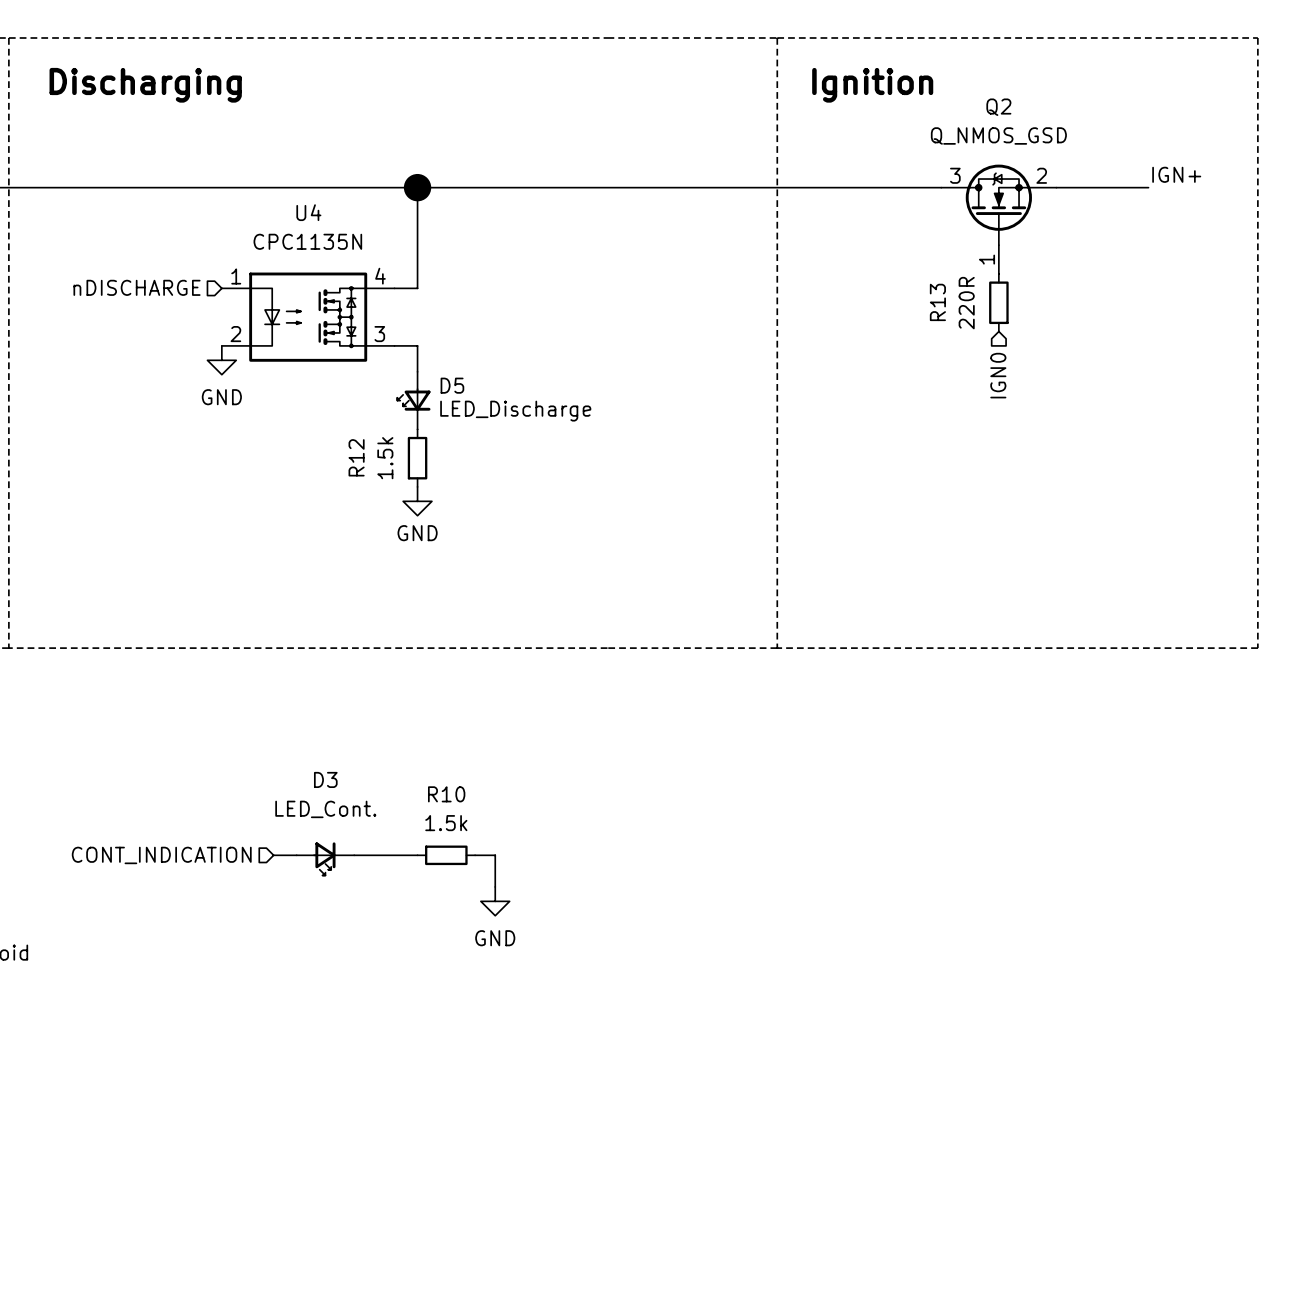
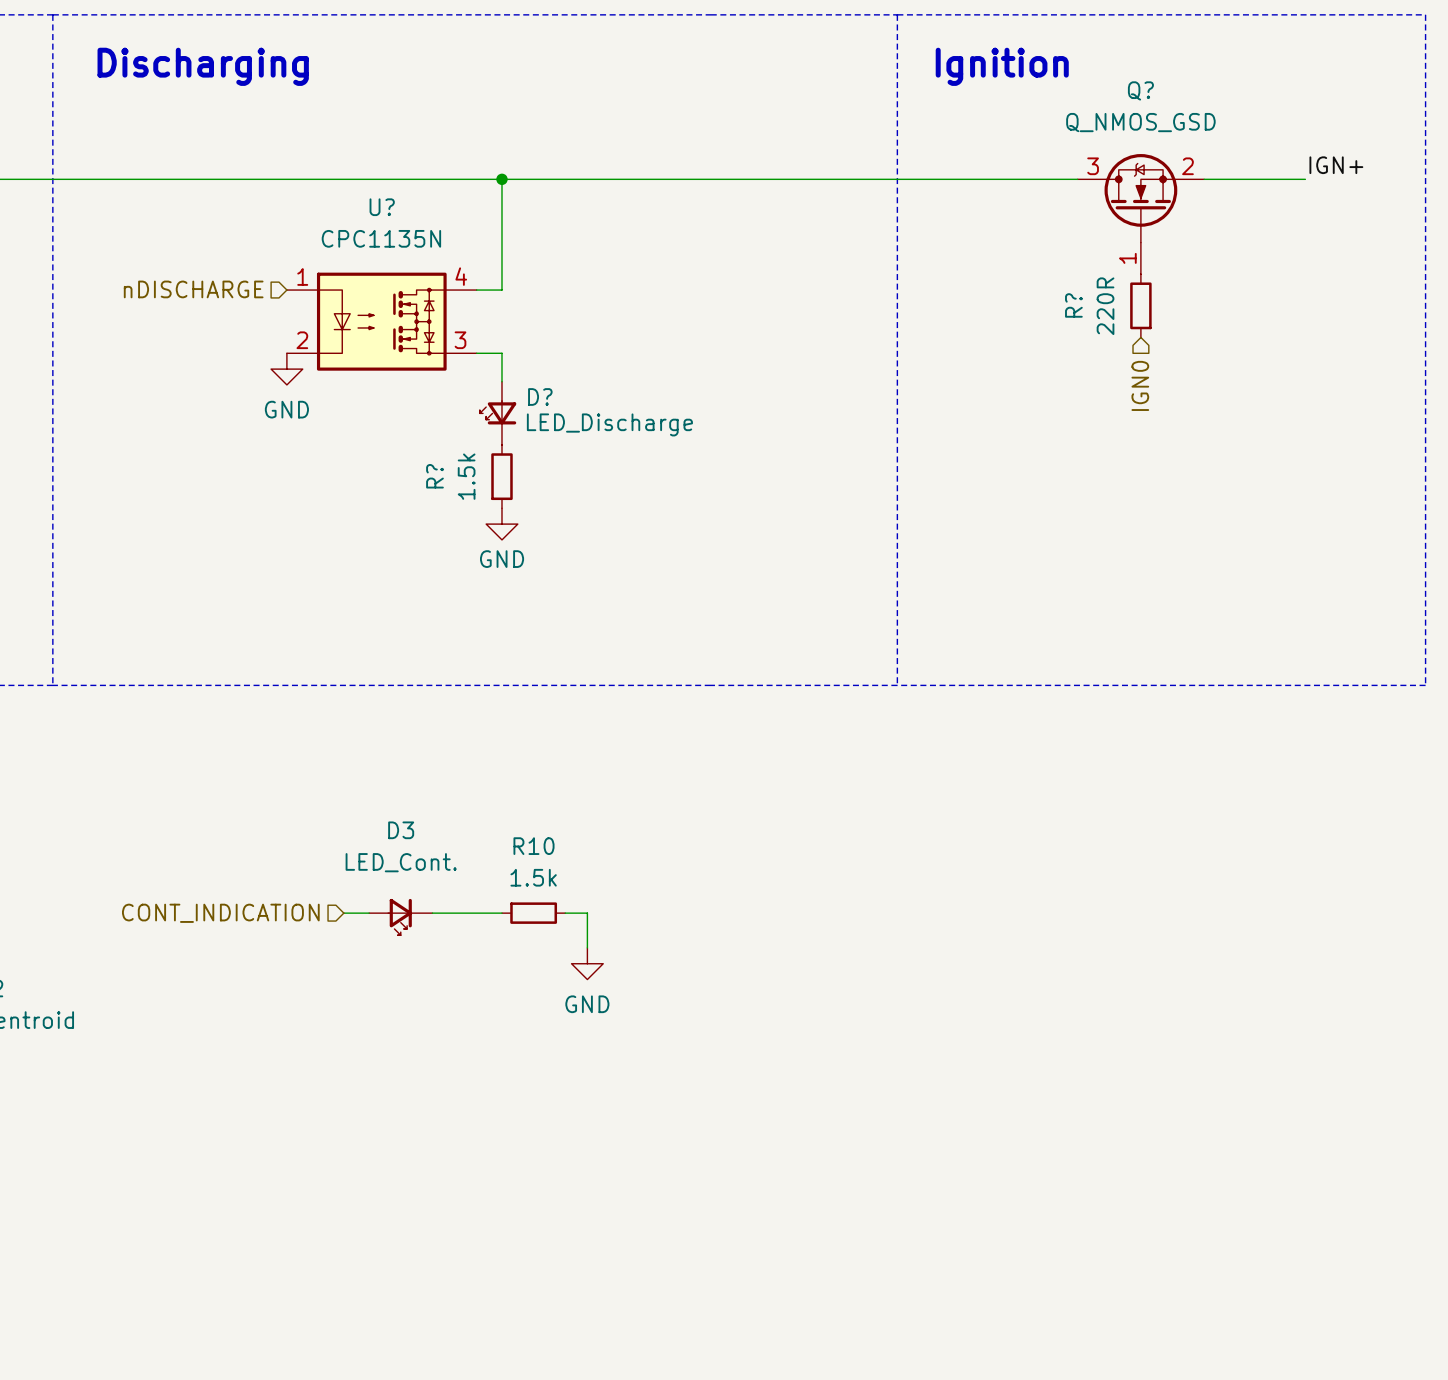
Q2 name: Q2 (998, 107) -> Q? (1140, 90)
junction size: [403, 173, 432, 202] -> [496, 173, 508, 186]
U4 name: U4 (308, 212) -> U? (382, 207)
R13 name: R13 (937, 302) -> R? (1073, 305)
D5 name: D5 (452, 385) -> D? (540, 396)
R12 name: R12 (356, 457) -> R? (434, 476)

